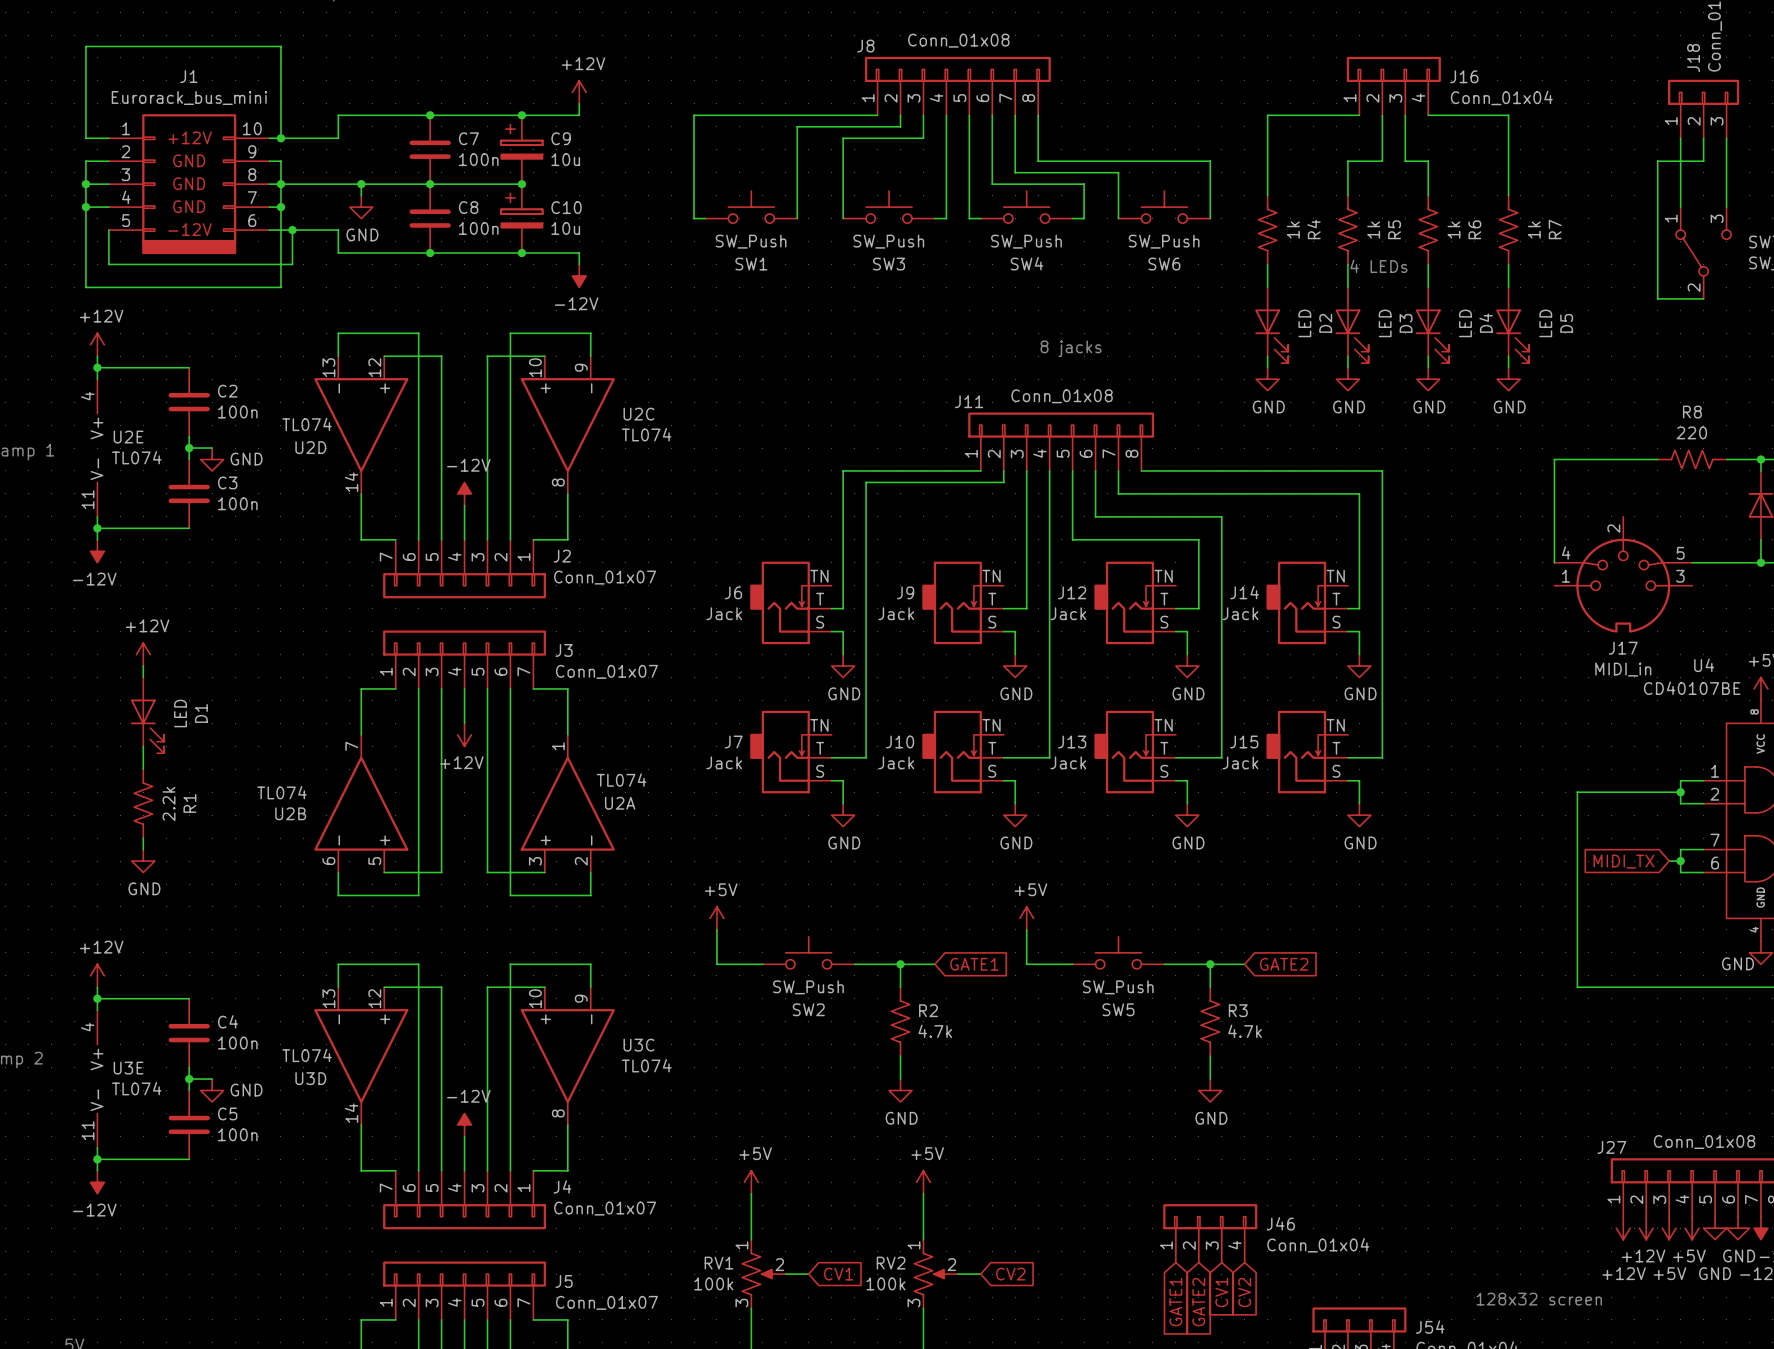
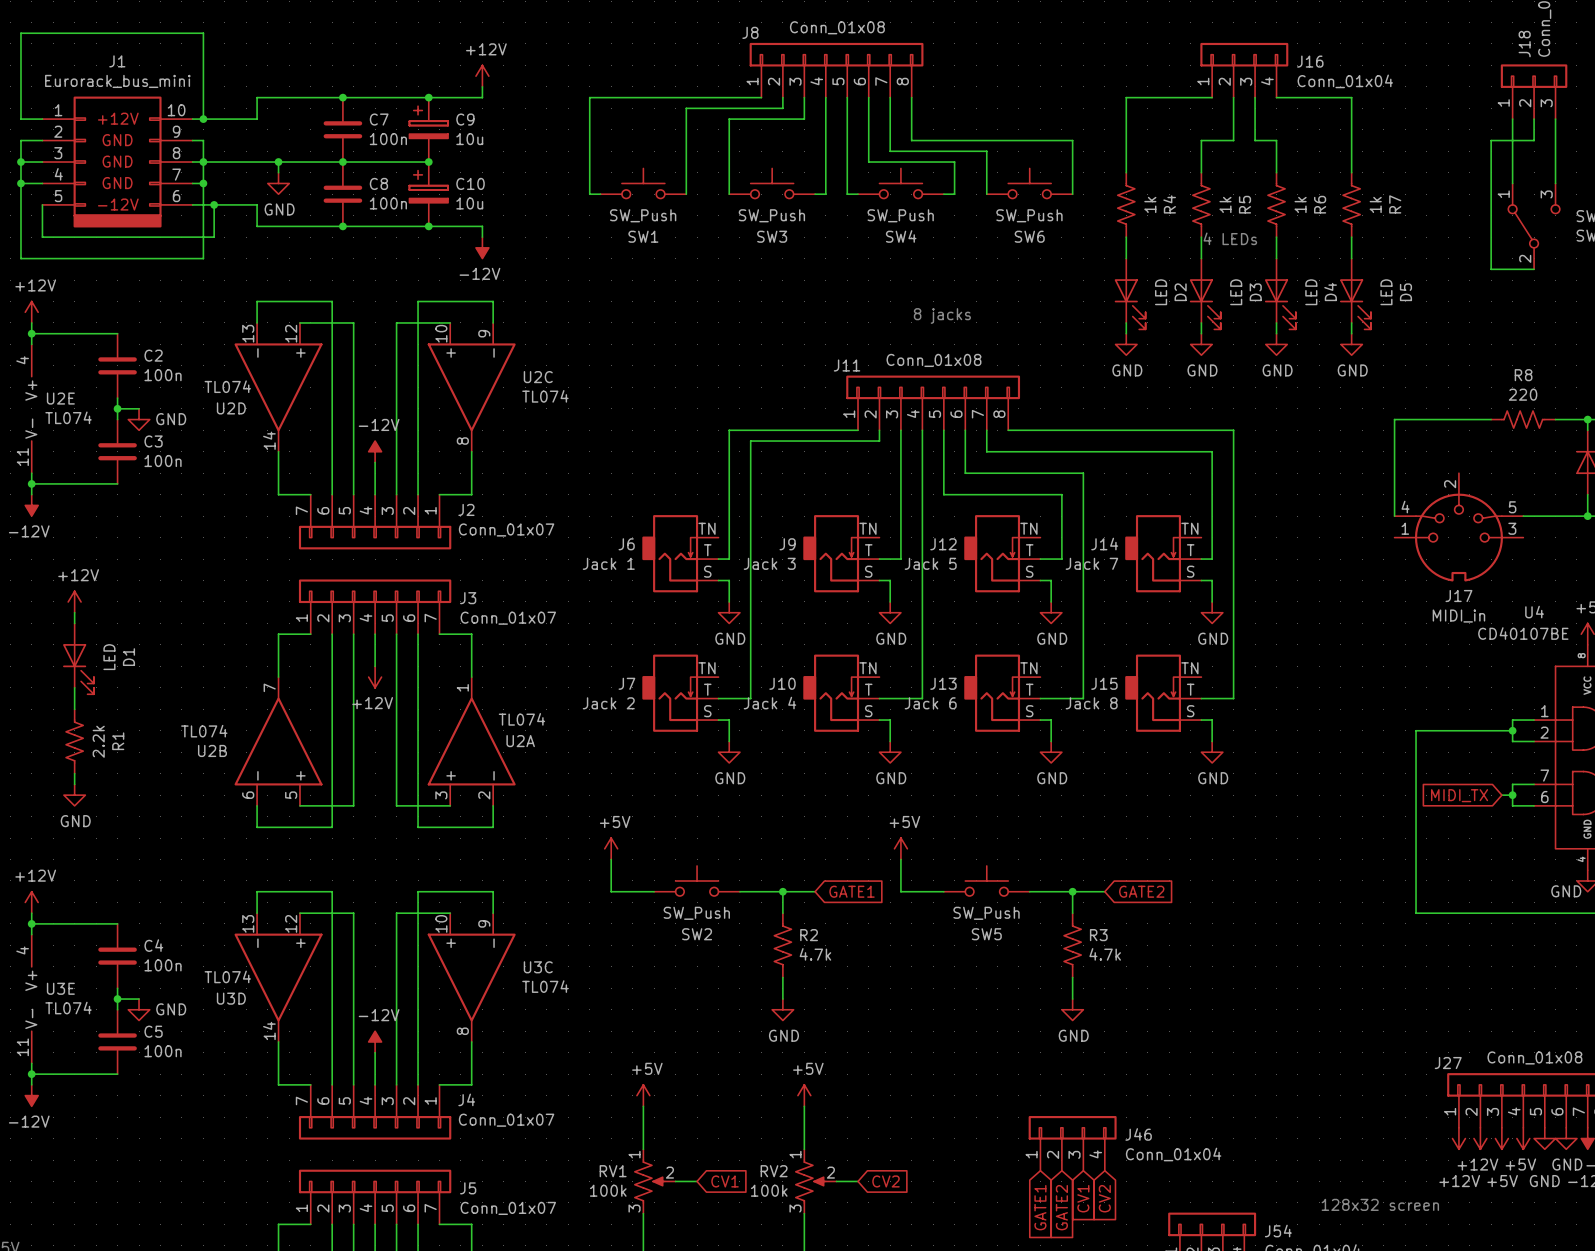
J6 value: Jack (724, 613) -> Jack 1 (608, 563)
J9 value: Jack (896, 613) -> Jack 3 (769, 563)
J12 value: Jack (1068, 613) -> Jack 5 (930, 563)
J14 value: Jack (1240, 613) -> Jack 7 (1091, 563)
J7 value: Jack (724, 762) -> Jack 2 (608, 703)
J10 value: Jack (896, 762) -> Jack 4 (769, 703)
J13 value: Jack (1068, 762) -> Jack 6 (930, 703)
J15 value: Jack (1240, 762) -> Jack 8 (1091, 703)

